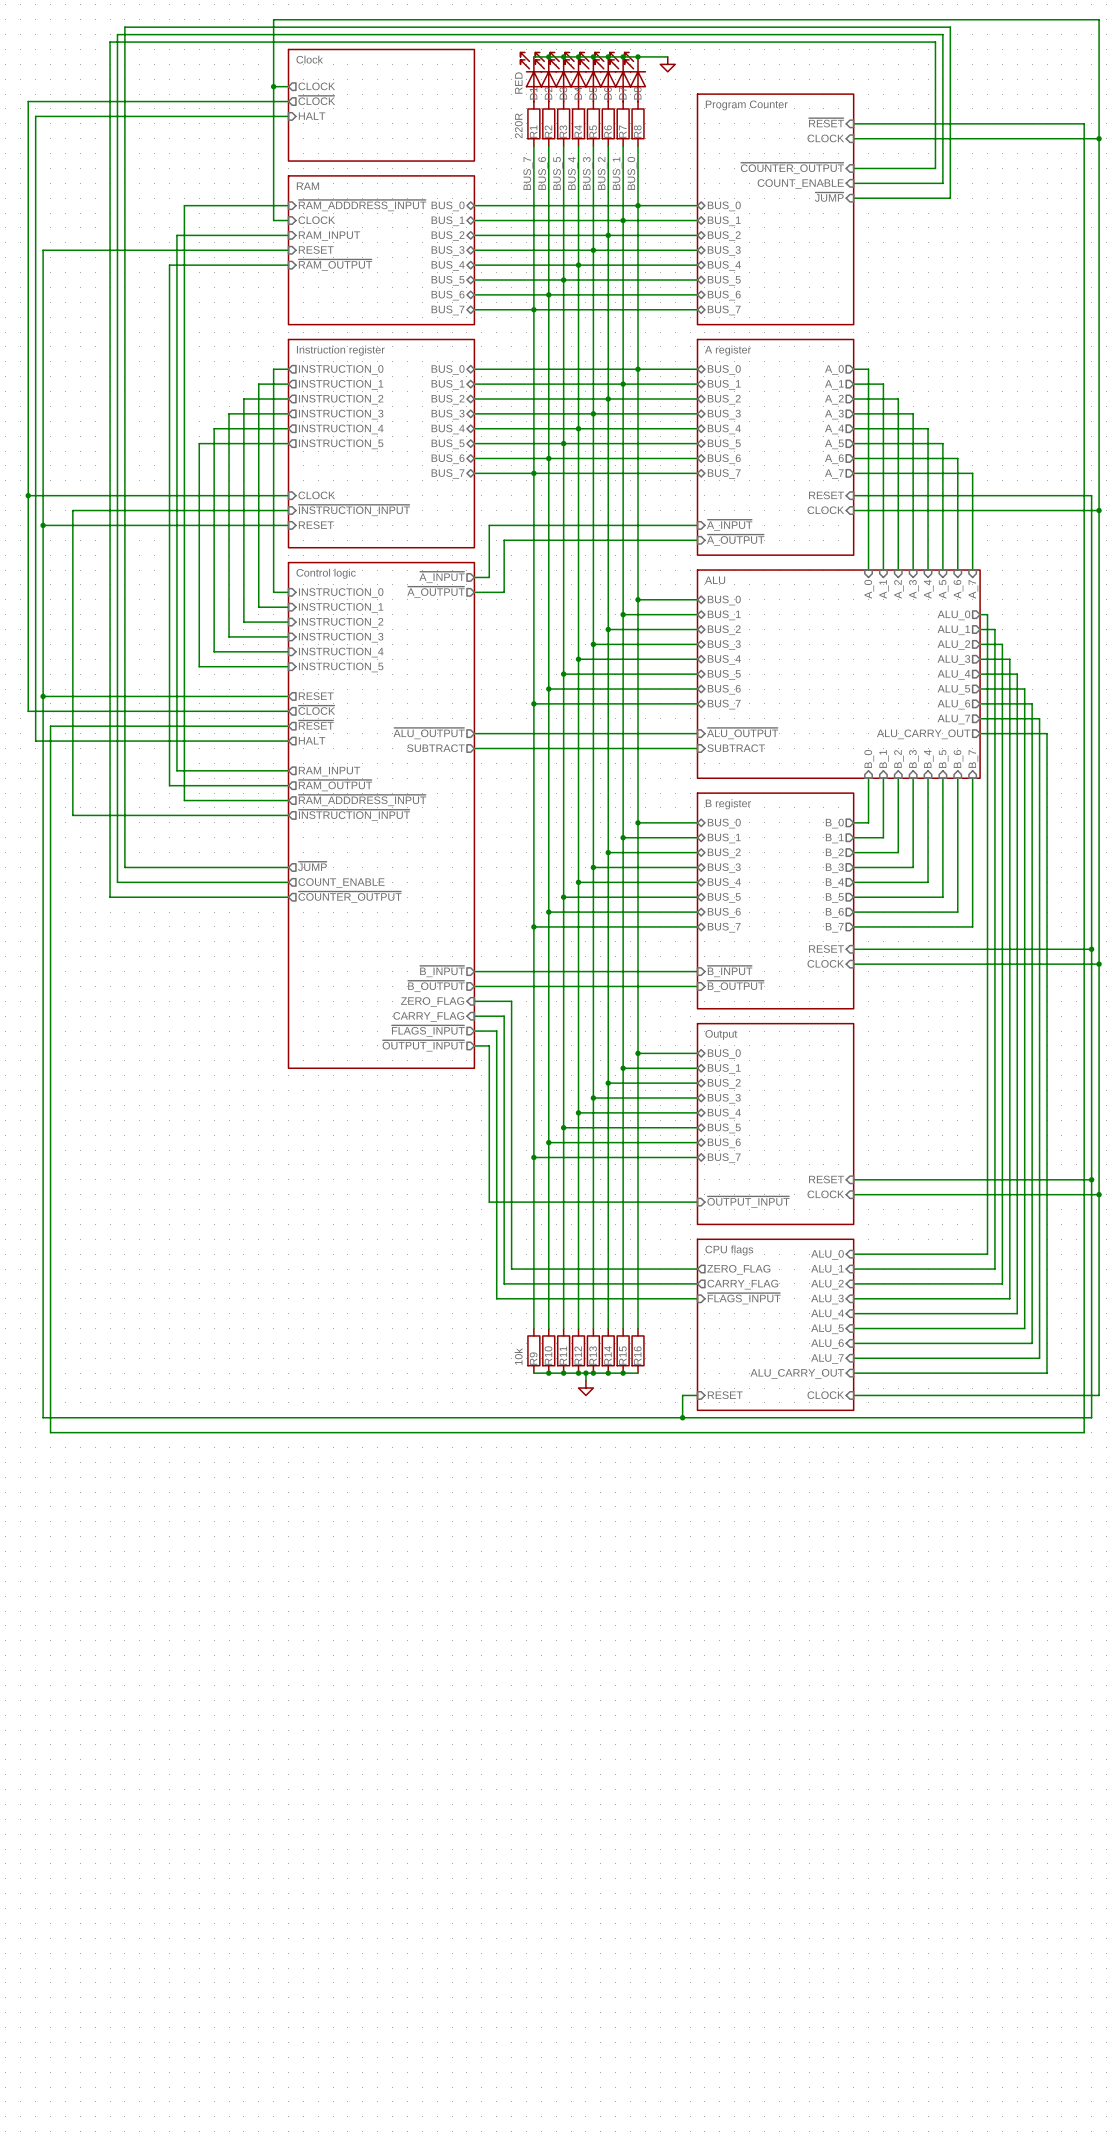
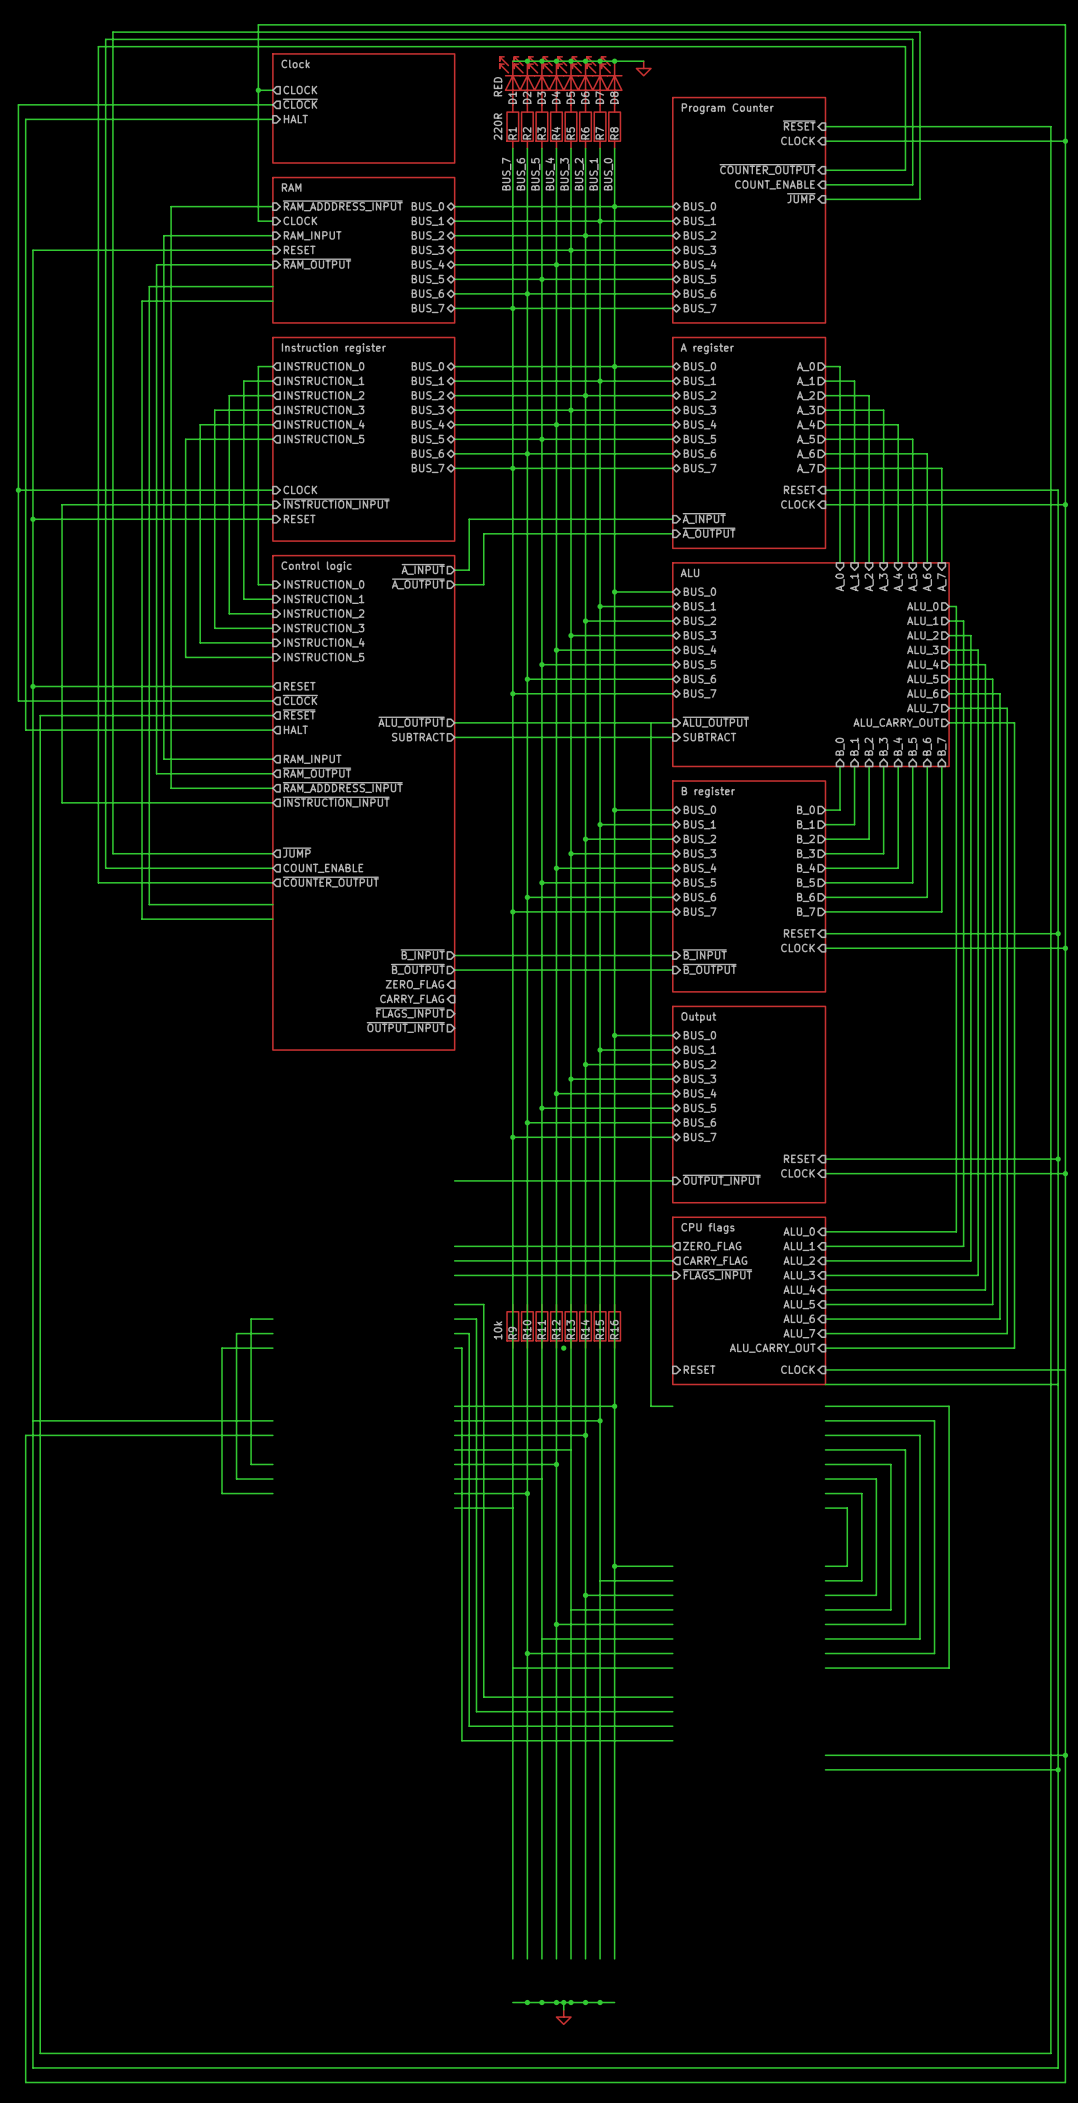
wire: none -> (272, 286) (149, 286) (149, 904) (272, 904)
wire: none -> (272, 301) (142, 301) (142, 919) (272, 919)
wire: (474, 1001) (511, 1001) (511, 1269) -> (454, 1246) (491, 1246)
wire: (474, 1016) (504, 1016) (504, 1283) -> (454, 1260) (483, 1260)
wire: (474, 1031) (496, 1031) (496, 1298) -> (454, 1275) (476, 1275)
wire: (474, 1045) (489, 1045) (489, 1202) -> (454, 1180) (469, 1180)
wire: none -> (454, 1304) (483, 1304) (483, 1697) (672, 1697)
wire: none -> (512, 1304) (512, 1958)
wire: none -> (527, 1304) (527, 1958)
wire: none -> (541, 1304) (541, 1958)
wire: none -> (556, 1304) (556, 1958)
wire: none -> (570, 1304) (570, 1958)
wire: none -> (585, 1304) (585, 1958)
wire: none -> (600, 1304) (600, 1958)
wire: none -> (614, 1304) (614, 1958)
wire: none -> (272, 1319) (251, 1319) (251, 1464) (272, 1464)
wire: none -> (454, 1319) (476, 1319) (476, 1711) (672, 1711)
wire: none -> (272, 1333) (236, 1333) (236, 1479) (272, 1479)
wire: none -> (454, 1333) (469, 1333) (469, 1726) (672, 1726)
wire: none -> (272, 1348) (221, 1348) (221, 1493) (272, 1493)
wire: none -> (454, 1348) (461, 1348) (461, 1740) (672, 1740)
wire: (533, 1373) (638, 1373) -> (454, 1464) (556, 1464)
junction: (548, 1373) -> none
junction: (563, 1373) -> none
junction: (578, 1373) -> none
wire: (585, 1373) (585, 1380) -> none
junction: (593, 1373) -> none
junction: (608, 1373) -> none
junction: (623, 1373) -> none
power symbol: (585, 1388) -> none
wire: (697, 1395) (682, 1395) (682, 1417) -> none
wire: none -> (1065, 1369) (1065, 2082) (25, 2082) (25, 1435) (272, 1435)
wire: none -> (825, 1384) (1058, 1384)
wire: (43, 1417) (1091, 1417) -> (32, 1391) (32, 2067) (1058, 2067) (1058, 1391)
junction: (682, 1417) -> none
wire: (50, 1432) (474, 1432) -> (40, 1406) (40, 2053) (1050, 2053) (1050, 1406)
wire: (638, 1432) (675, 1432) -> (650, 722) (650, 1406)
junction: none -> (614, 1406)
wire: (697, 1432) (853, 1432) -> none
wire: (980, 1432) (1084, 1432) -> (949, 1406) (949, 1668) (825, 1668)
wire: none -> (32, 1420) (272, 1420)
wire: none -> (454, 1420) (600, 1420)
junction: none -> (600, 1420)
wire: none -> (825, 1420) (934, 1420) (934, 1653) (825, 1653)
wire: none -> (454, 1435) (585, 1435)
junction: none -> (585, 1435)
wire: none -> (825, 1435) (920, 1435) (920, 1638) (825, 1638)
wire: none -> (454, 1449) (570, 1449)
wire: none -> (825, 1449) (905, 1449) (905, 1624) (825, 1624)
junction: none -> (556, 1464)
wire: none -> (825, 1464) (890, 1464) (890, 1609) (825, 1609)
wire: none -> (454, 1479) (541, 1479)
wire: none -> (825, 1479) (876, 1479) (876, 1595) (825, 1595)
wire: none -> (454, 1493) (527, 1493)
junction: none -> (527, 1493)
wire: none -> (825, 1493) (861, 1493) (861, 1580) (825, 1580)
wire: none -> (454, 1508) (512, 1508)
wire: none -> (825, 1508) (847, 1508) (847, 1566) (825, 1566)
wire: none -> (614, 1566) (672, 1566)
junction: none -> (614, 1566)
wire: none -> (600, 1580) (672, 1580)
wire: none -> (585, 1595) (672, 1595)
junction: none -> (585, 1595)
wire: none -> (570, 1609) (672, 1609)
wire: none -> (556, 1624) (672, 1624)
junction: none -> (556, 1624)
wire: none -> (541, 1638) (672, 1638)
wire: none -> (527, 1653) (672, 1653)
junction: none -> (527, 1653)
wire: none -> (512, 1668) (672, 1668)
wire: none -> (825, 1755) (1065, 1755)
junction: none -> (1065, 1755)
wire: none -> (825, 1769) (1058, 1769)
junction: none -> (1058, 1769)
wire: none -> (512, 2002) (614, 2002)
junction: none -> (527, 2002)
junction: none -> (541, 2002)
junction: none -> (556, 2002)
wire: none -> (563, 2002) (563, 2009)
junction: none -> (563, 2002)
junction: none -> (570, 2002)
junction: none -> (585, 2002)
junction: none -> (600, 2002)
power symbol: none -> (563, 2017)

